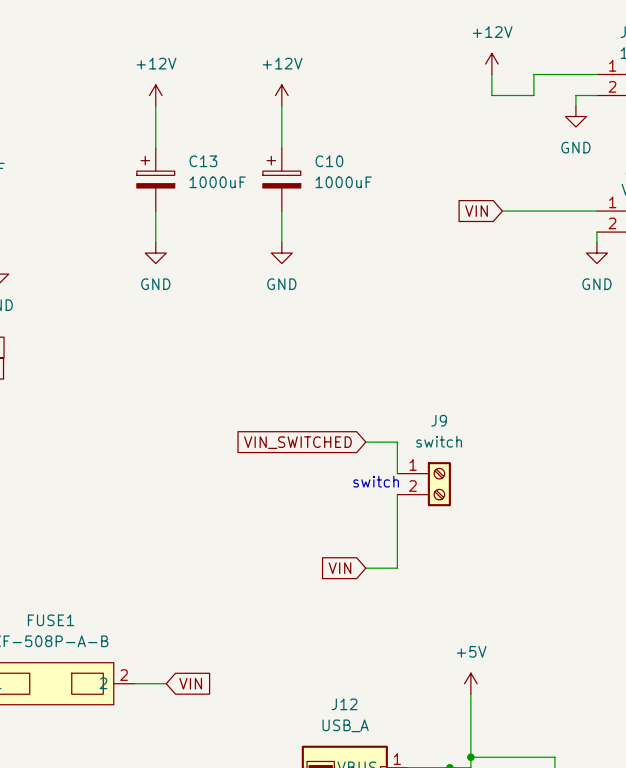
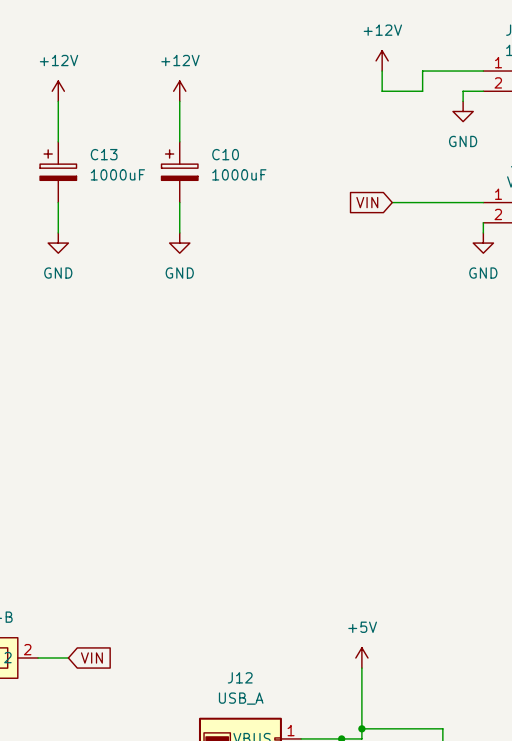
global label: VIN_SWITCHED (297, 442) -> none
wire: (365, 442) (397, 442) (397, 473) -> none
text: switch (376, 481) -> none
J9: switch (424, 484) -> none
wire: (397, 494) (397, 568) (365, 568) -> none
global label: VIN (339, 568) -> none

